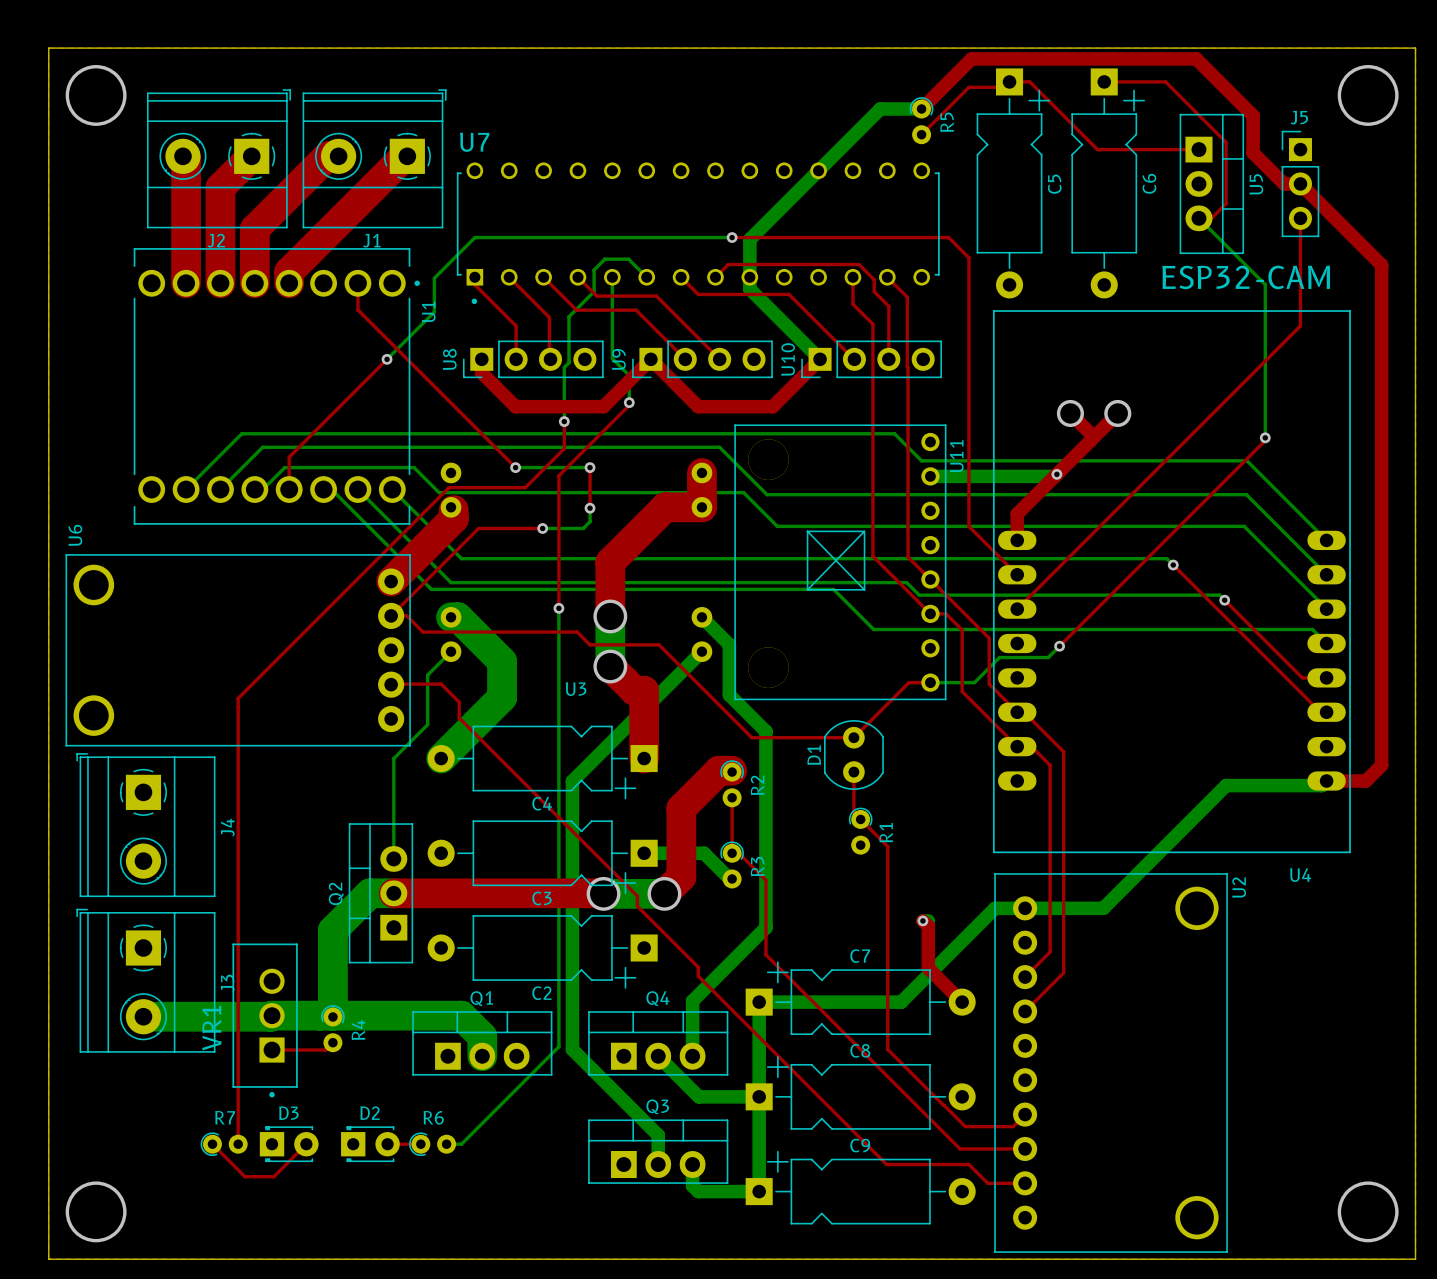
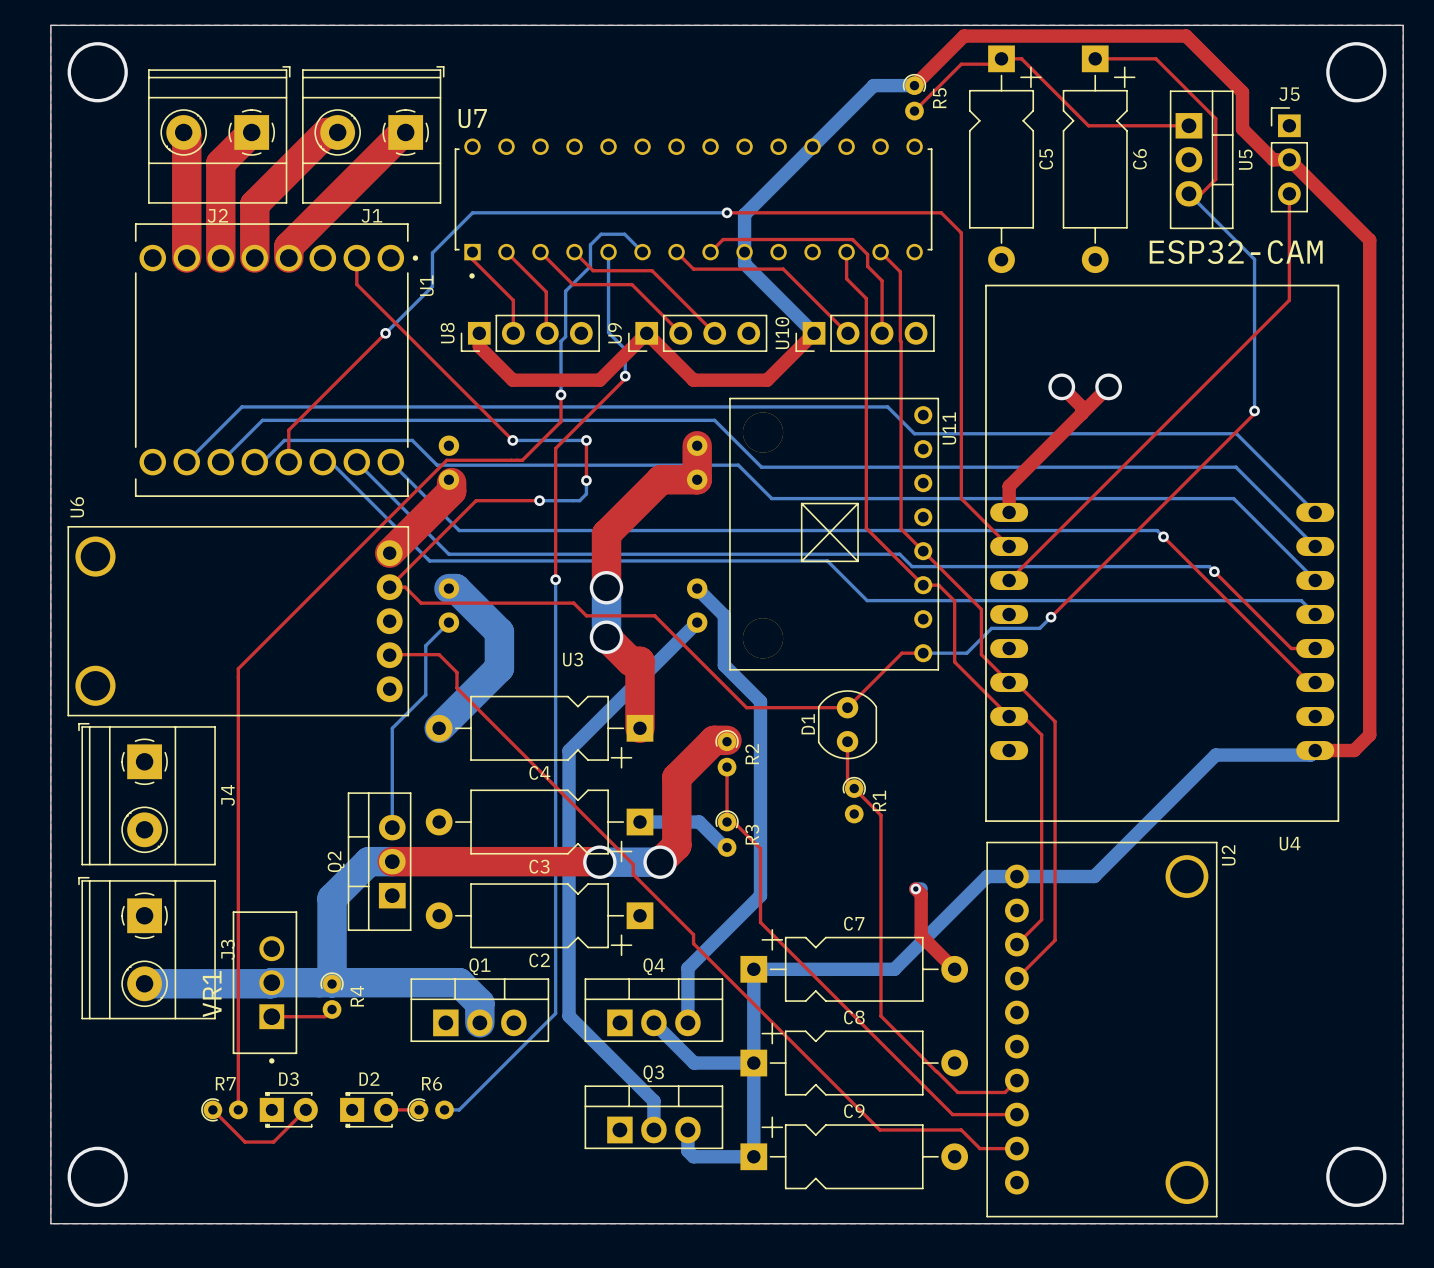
bottom track: (1056, 474) (1054, 476) (930, 476) -> none
via: (1056, 474) -> none

